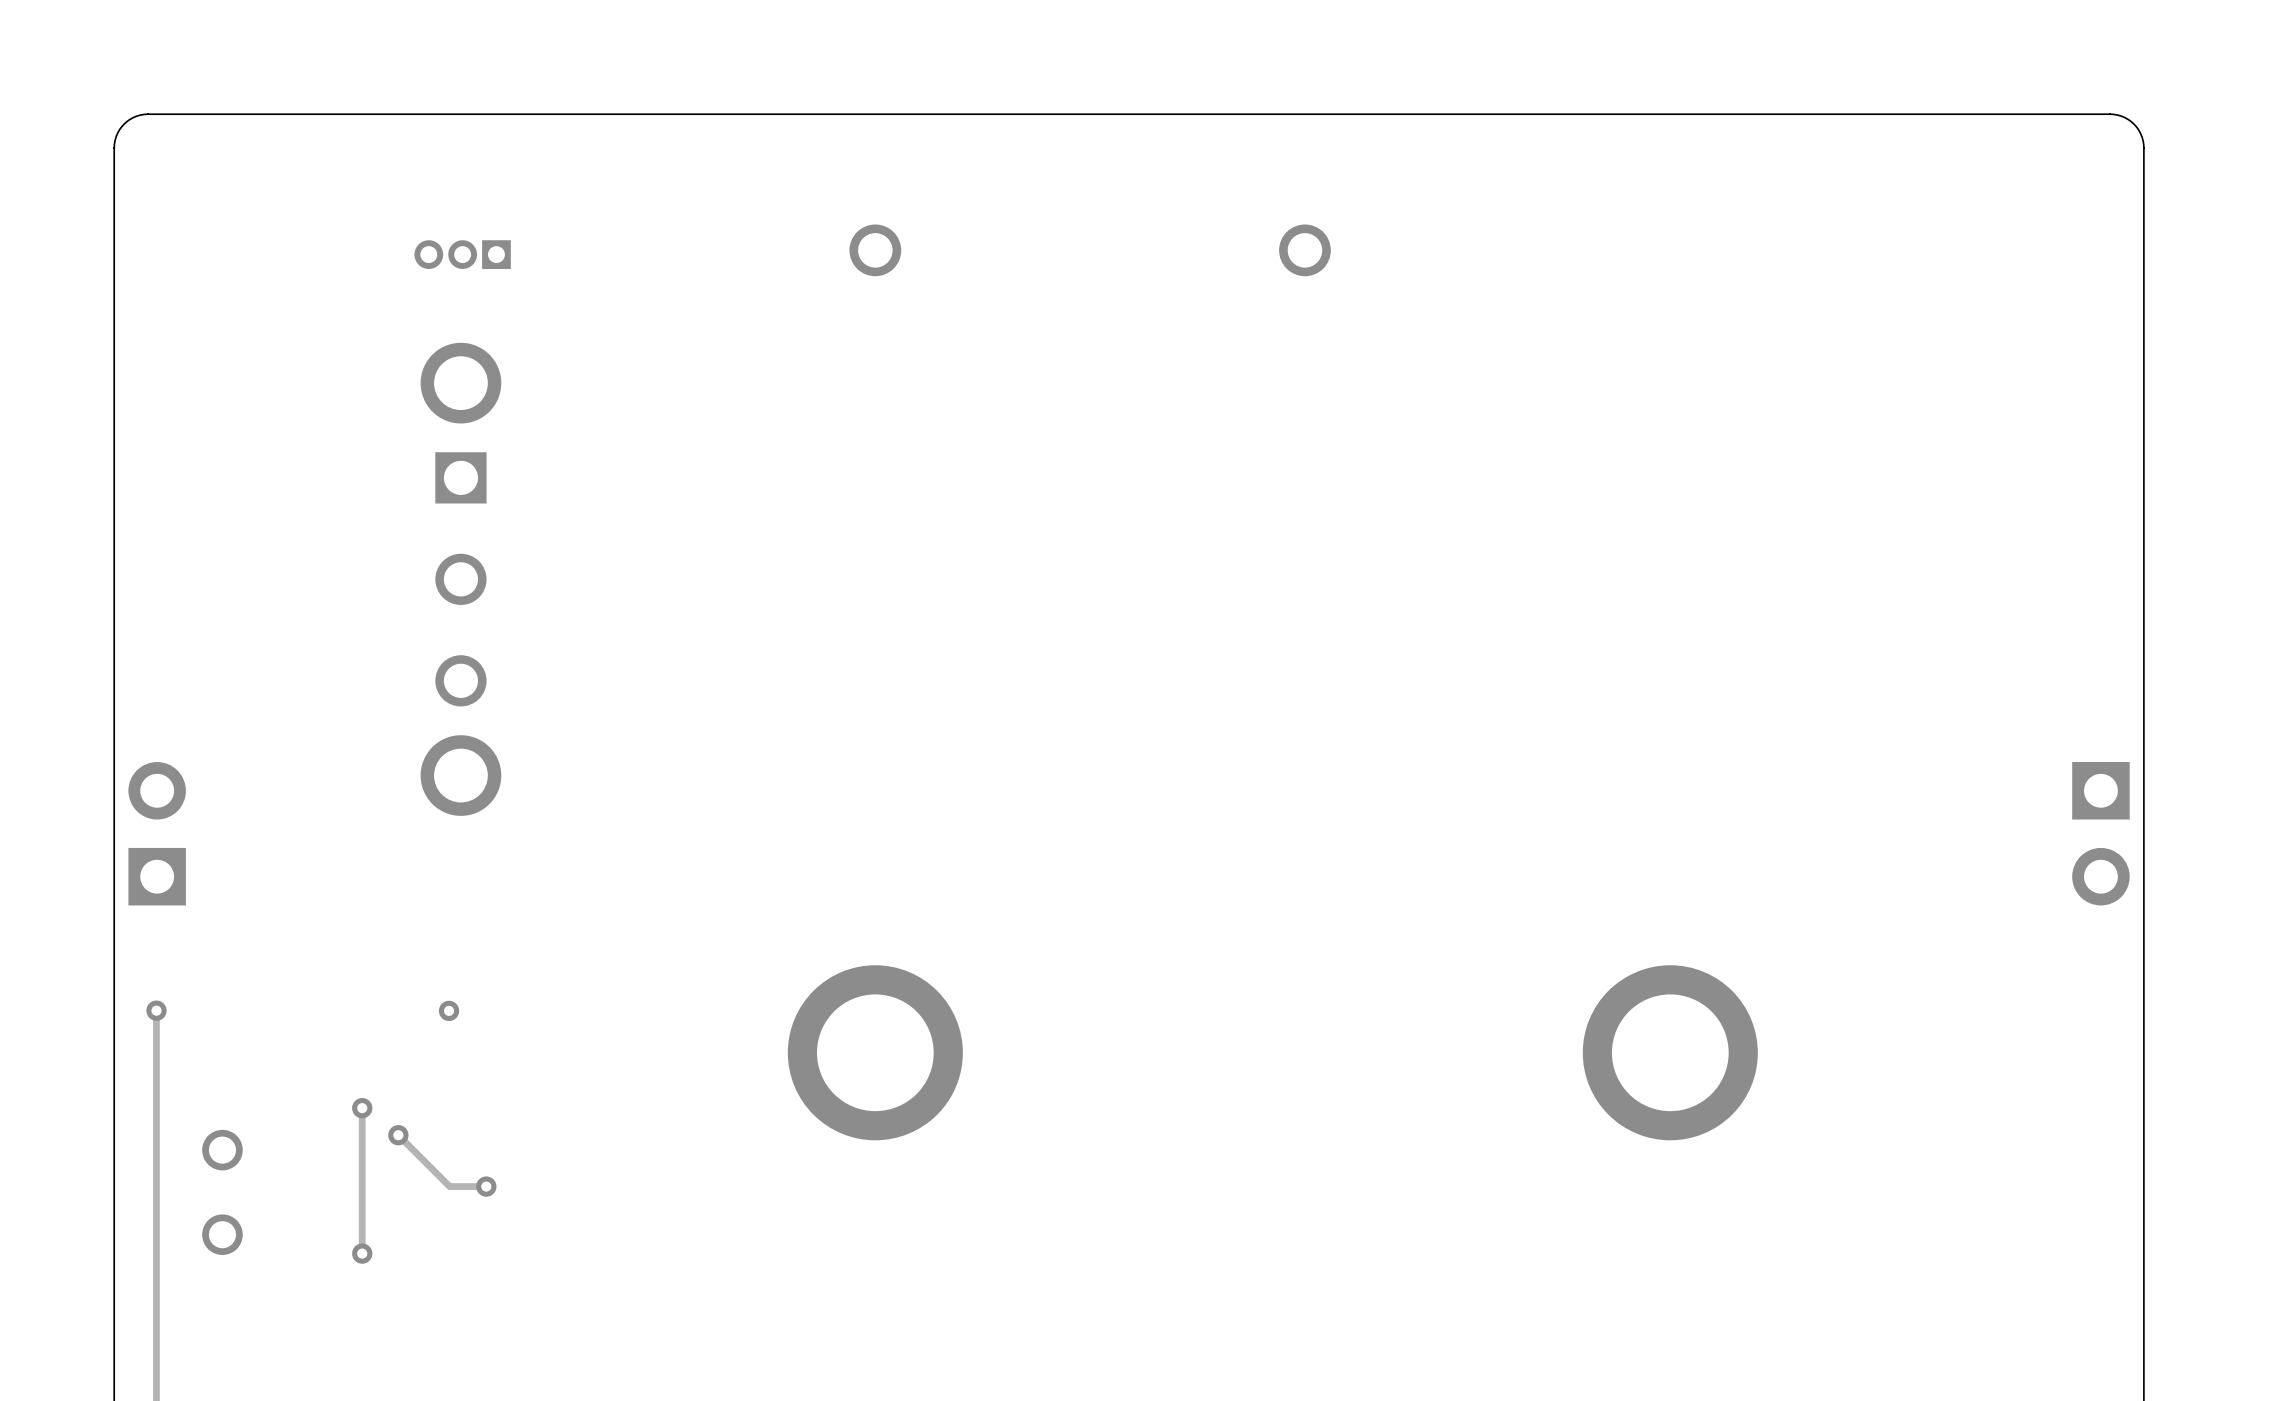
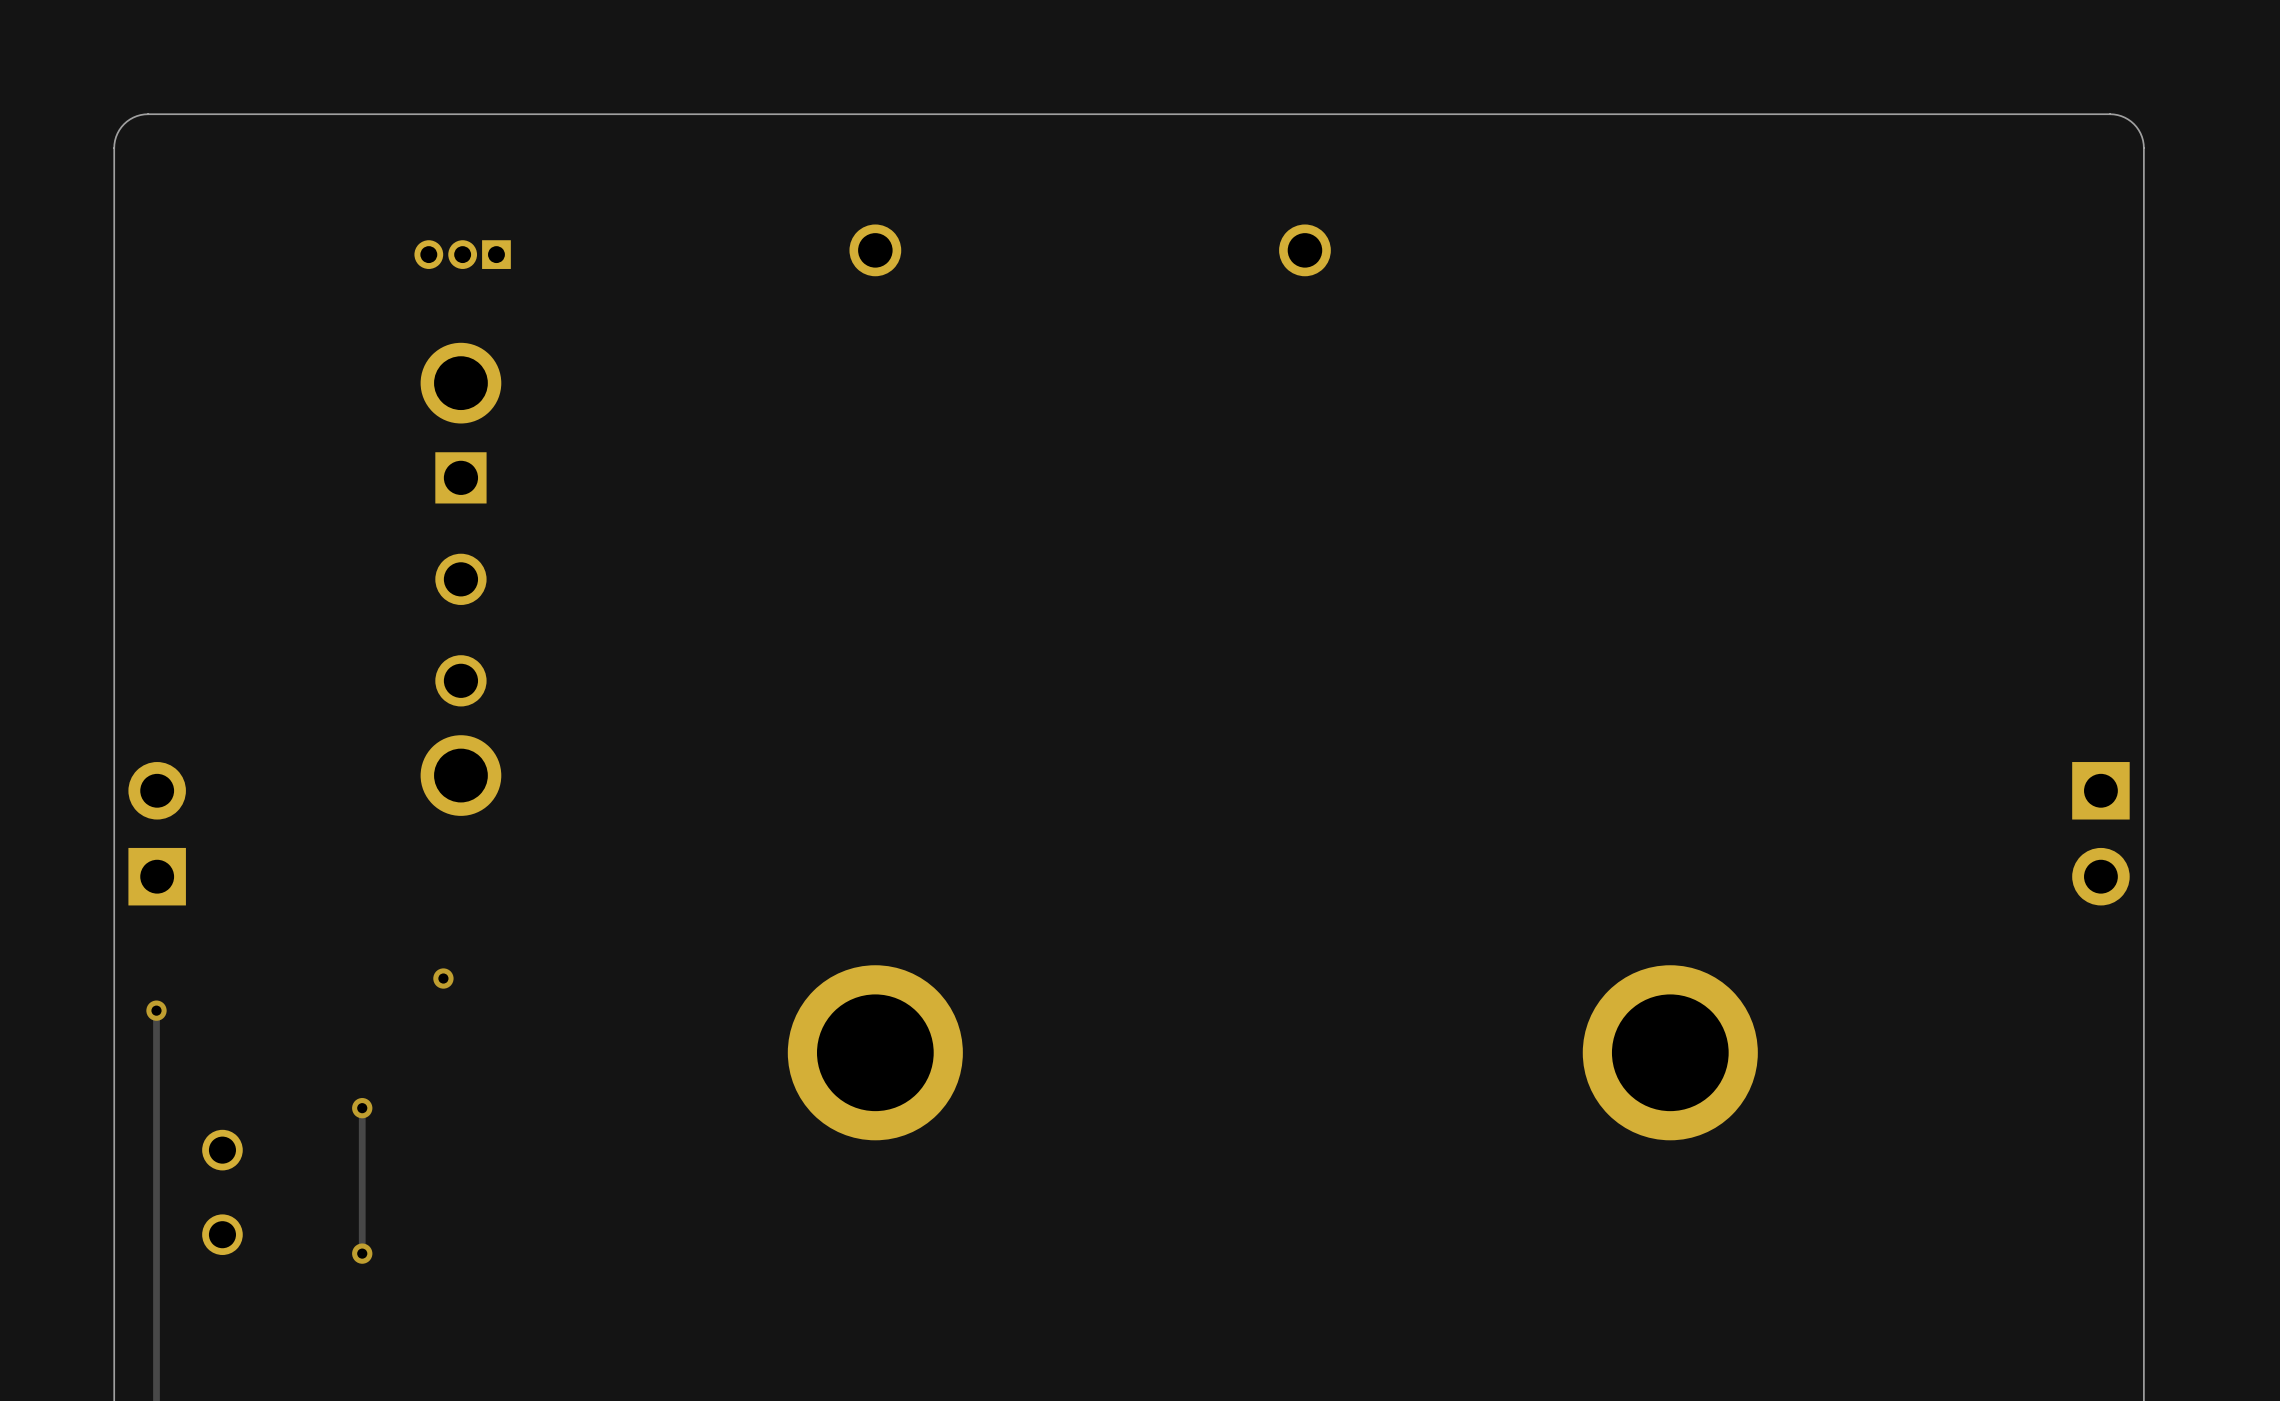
via position: (449, 1010) -> (443, 978)
track: (398, 1135) (449, 1186) (486, 1186) -> none
via: (398, 1135) -> none
via: (486, 1186) -> none

